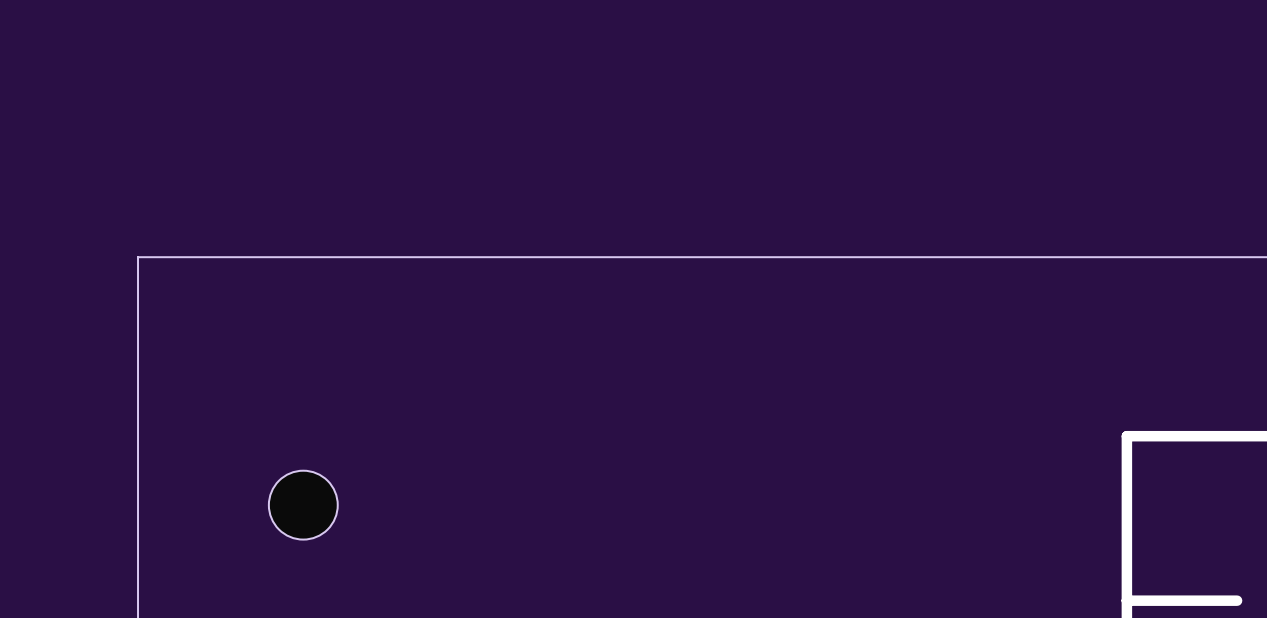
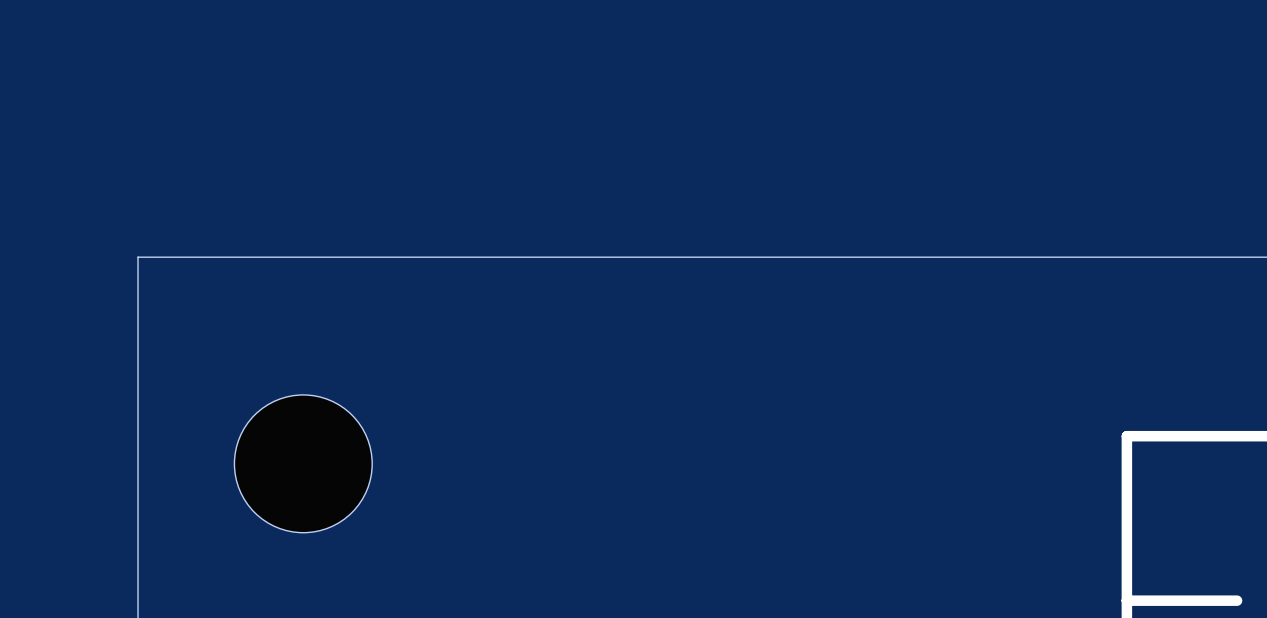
hole size: [268, 470, 338, 540] -> [234, 394, 373, 533]

